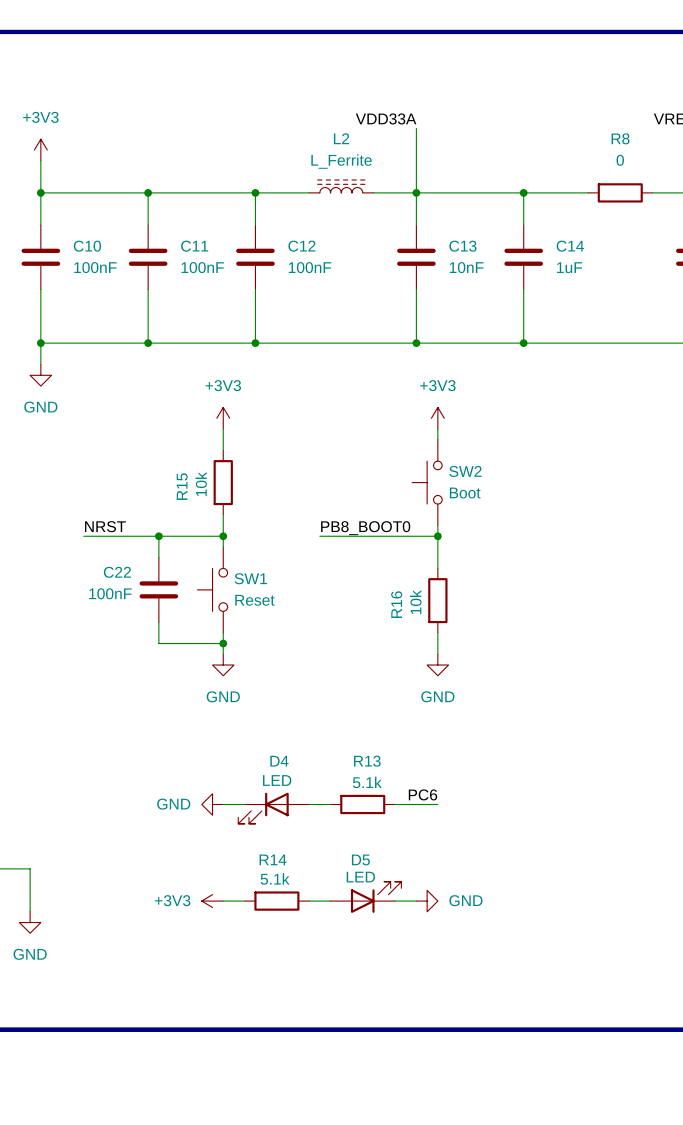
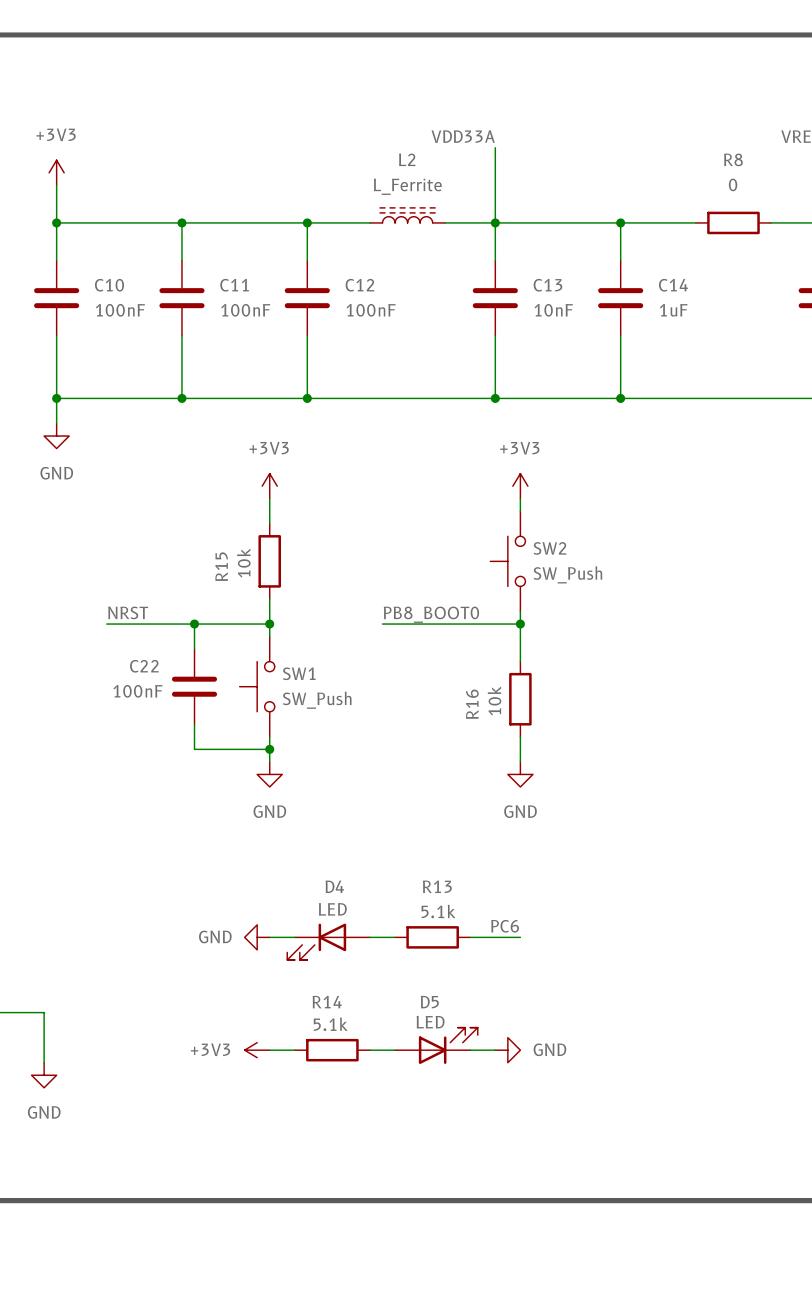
SW2 value: Boot (465, 493) -> SW_Push (567, 574)
SW1 value: Reset (254, 600) -> SW_Push (317, 700)

